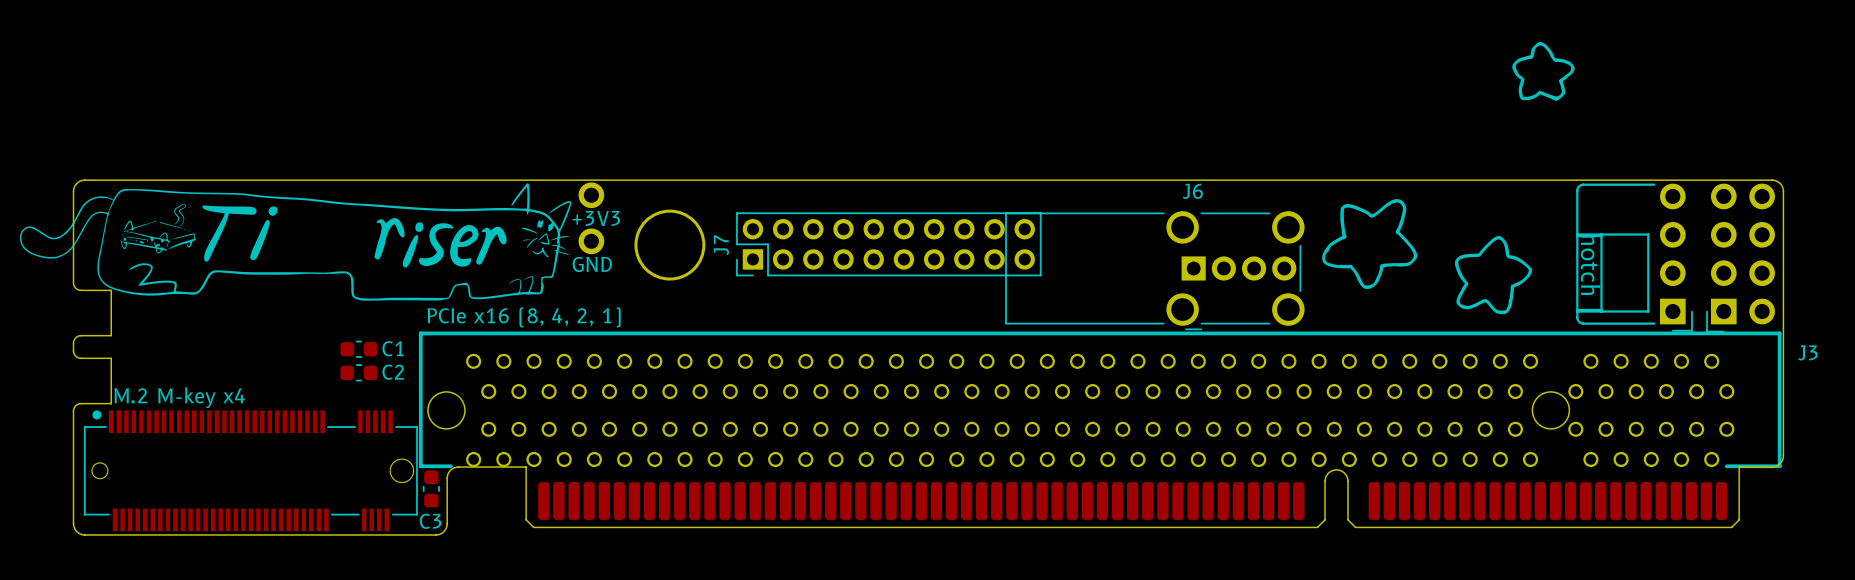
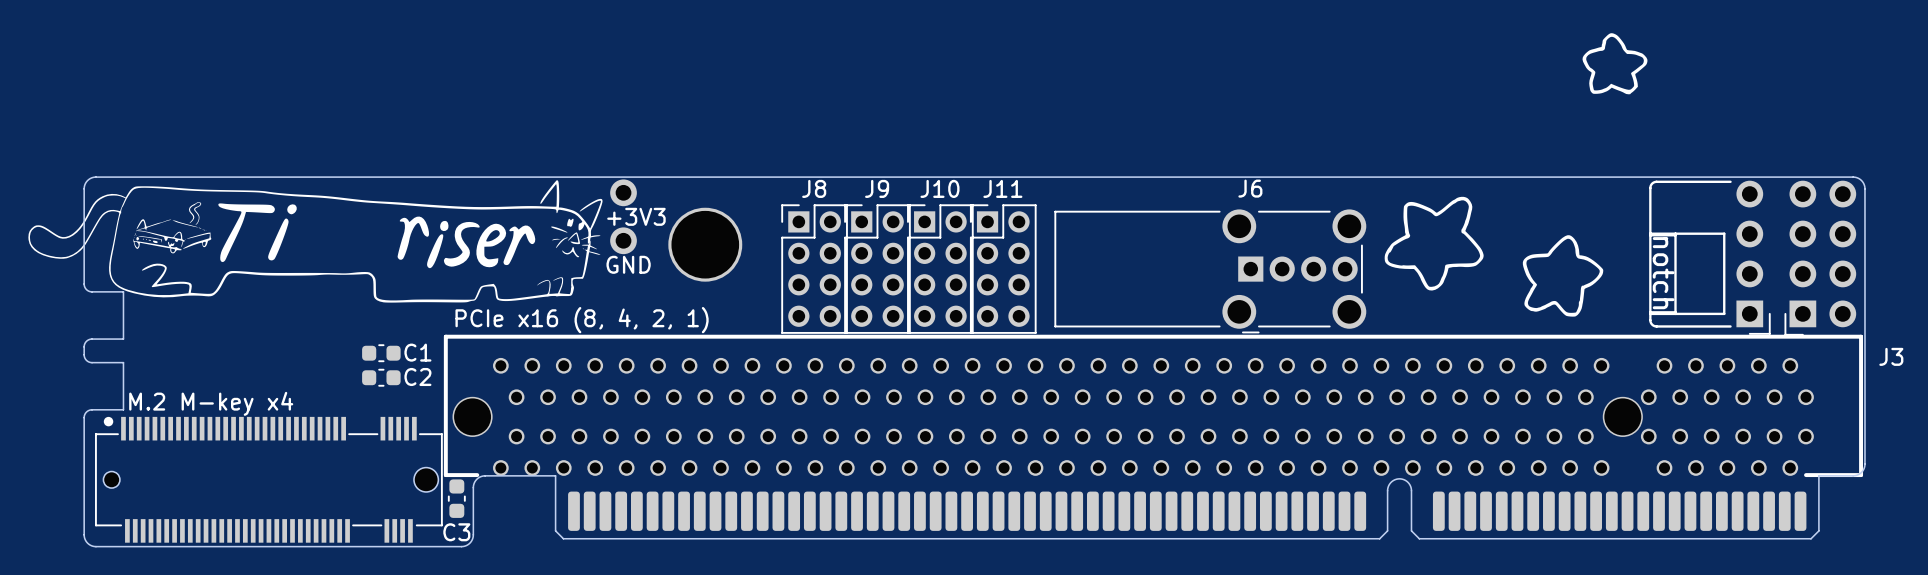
J7: (888, 244) -> none
J8: none -> (814, 269)
J9: none -> (877, 269)
J10: none -> (940, 269)
J11: none -> (1003, 269)

